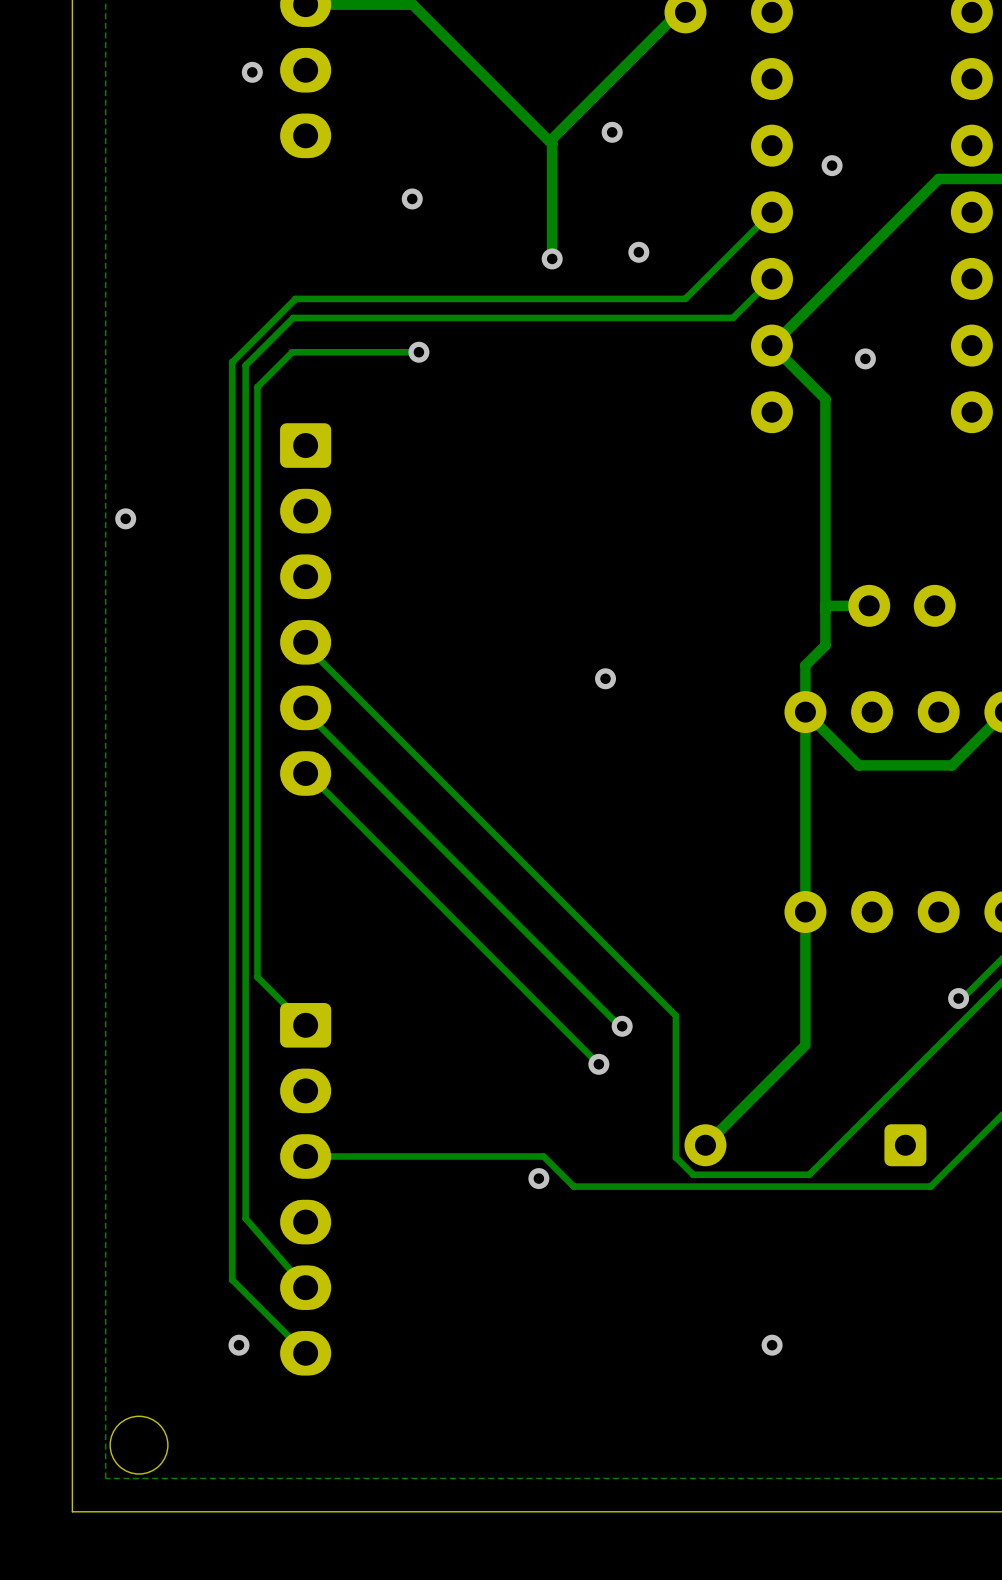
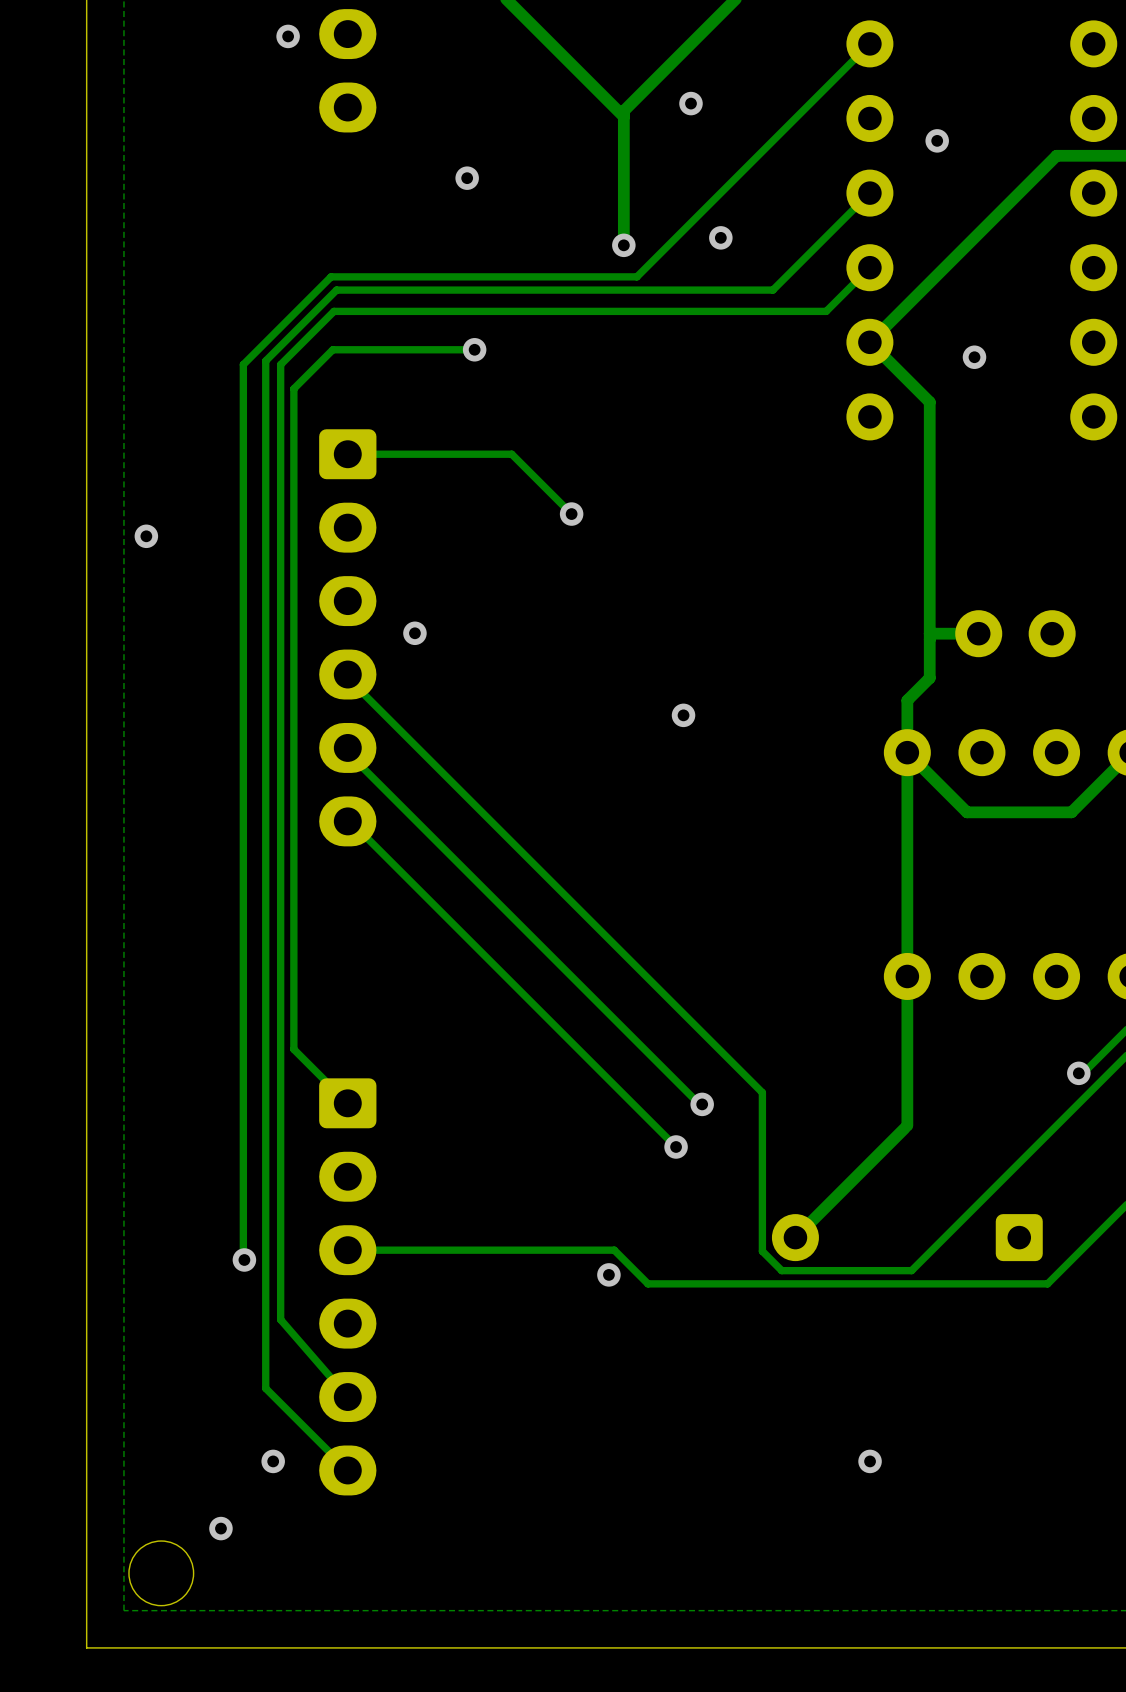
track: none -> (869, 43) (636, 276) (331, 276) (243, 364) (244, 1259)
track: none -> (347, 454) (511, 454) (571, 514)
via: none -> (571, 514)
via: none -> (414, 633)
via: none -> (244, 1259)
via: none -> (220, 1528)

